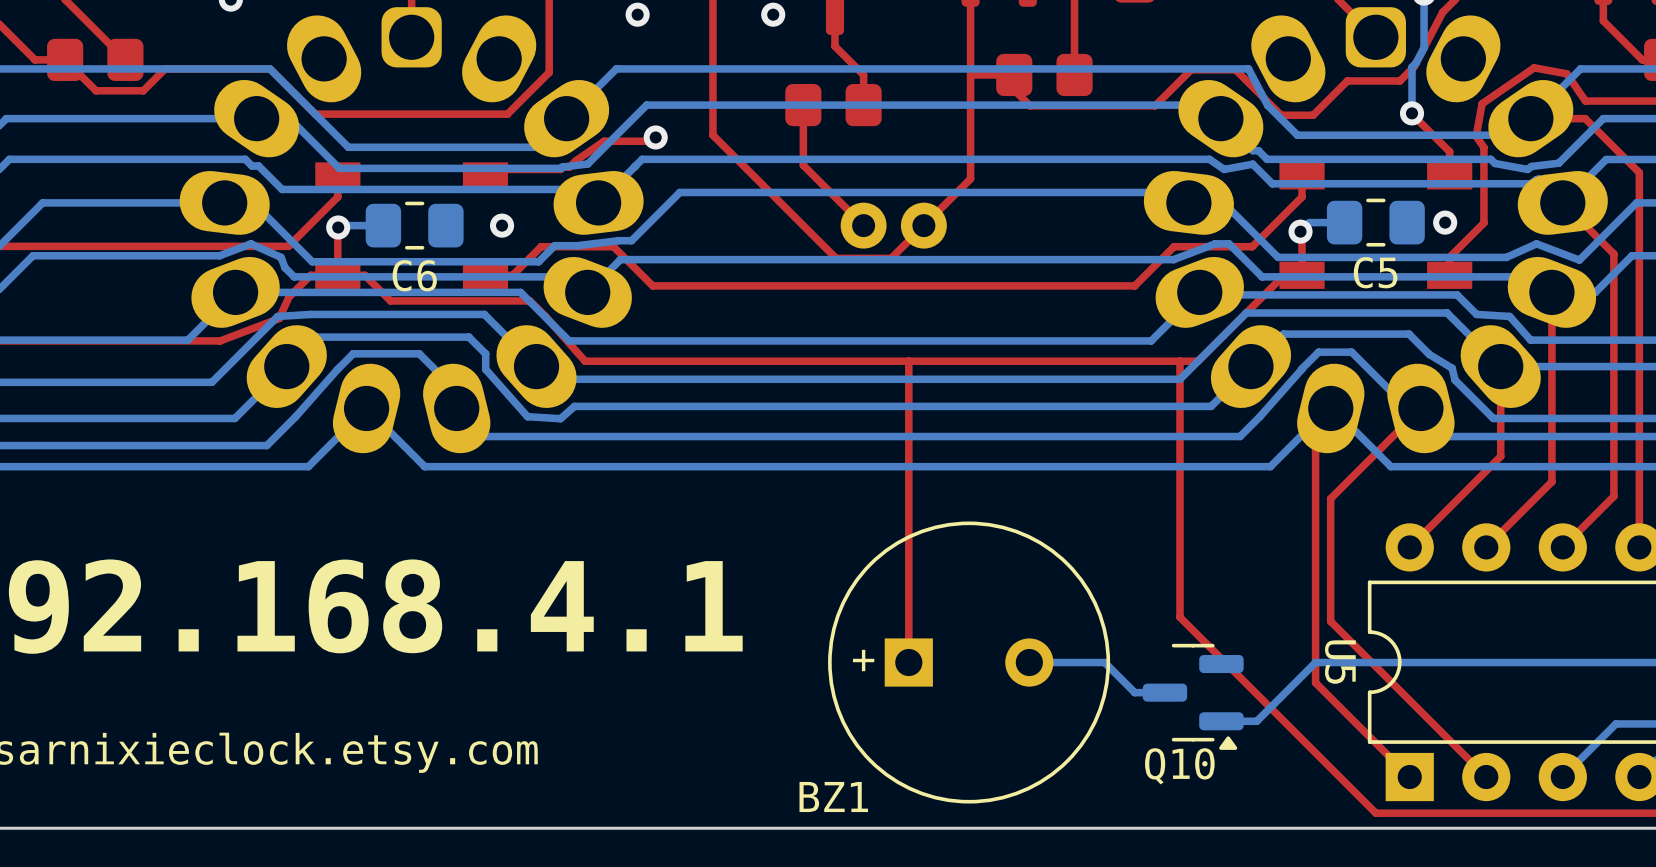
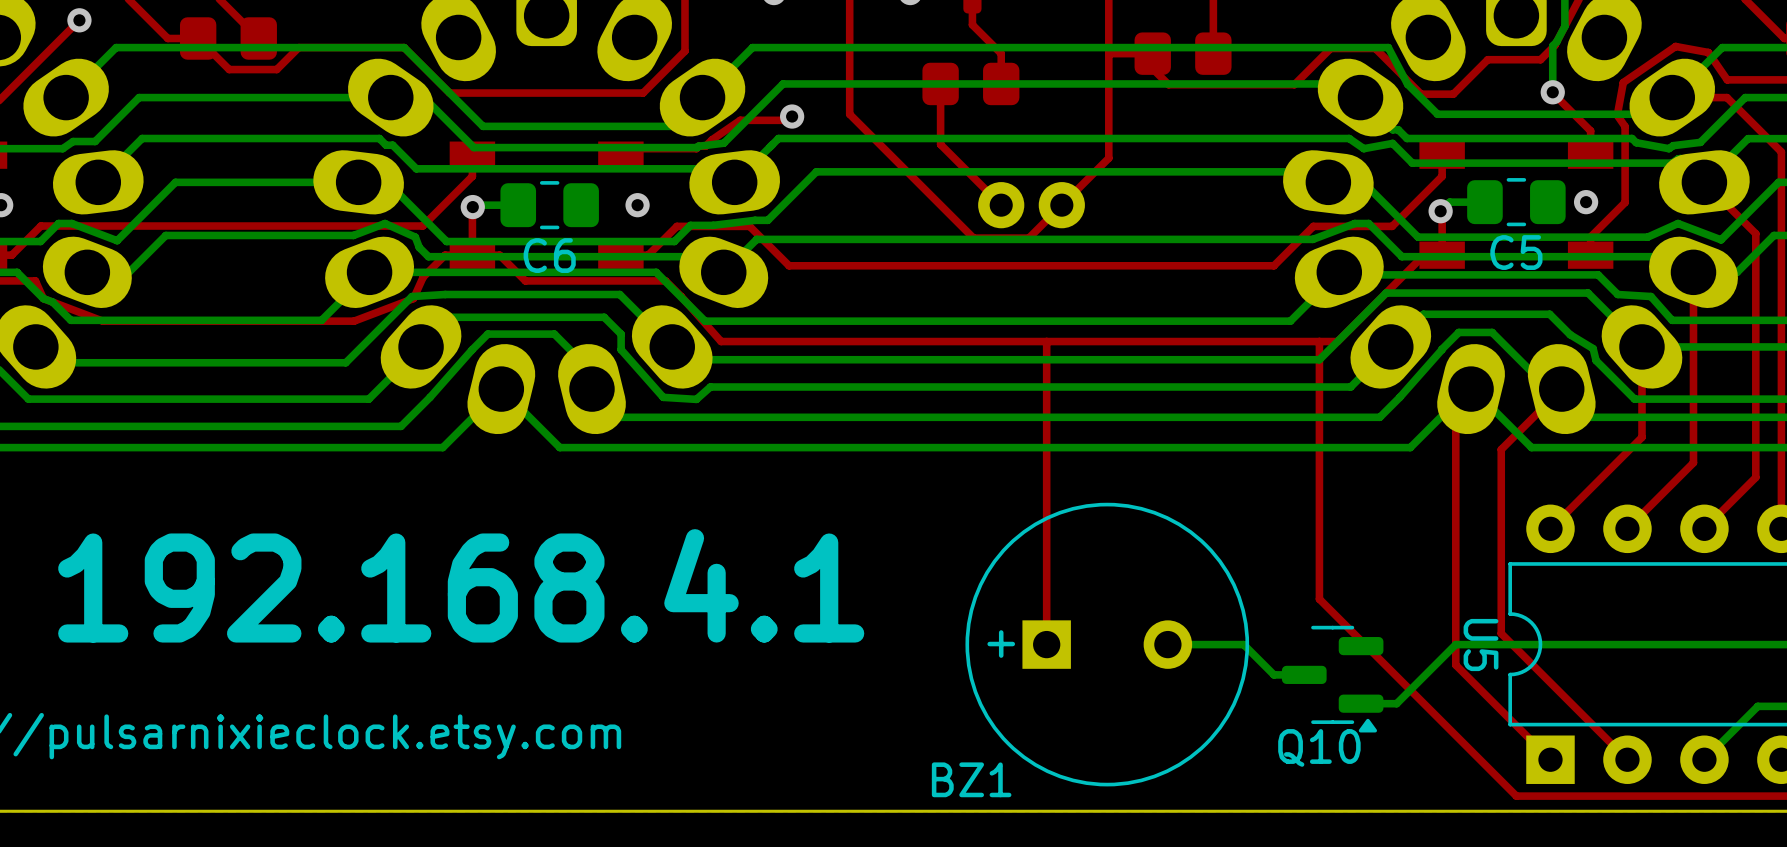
top track: (1360, 468) (1330, 498) (1330, 621) (1360, 651) -> (1501, 449) (1501, 633)

